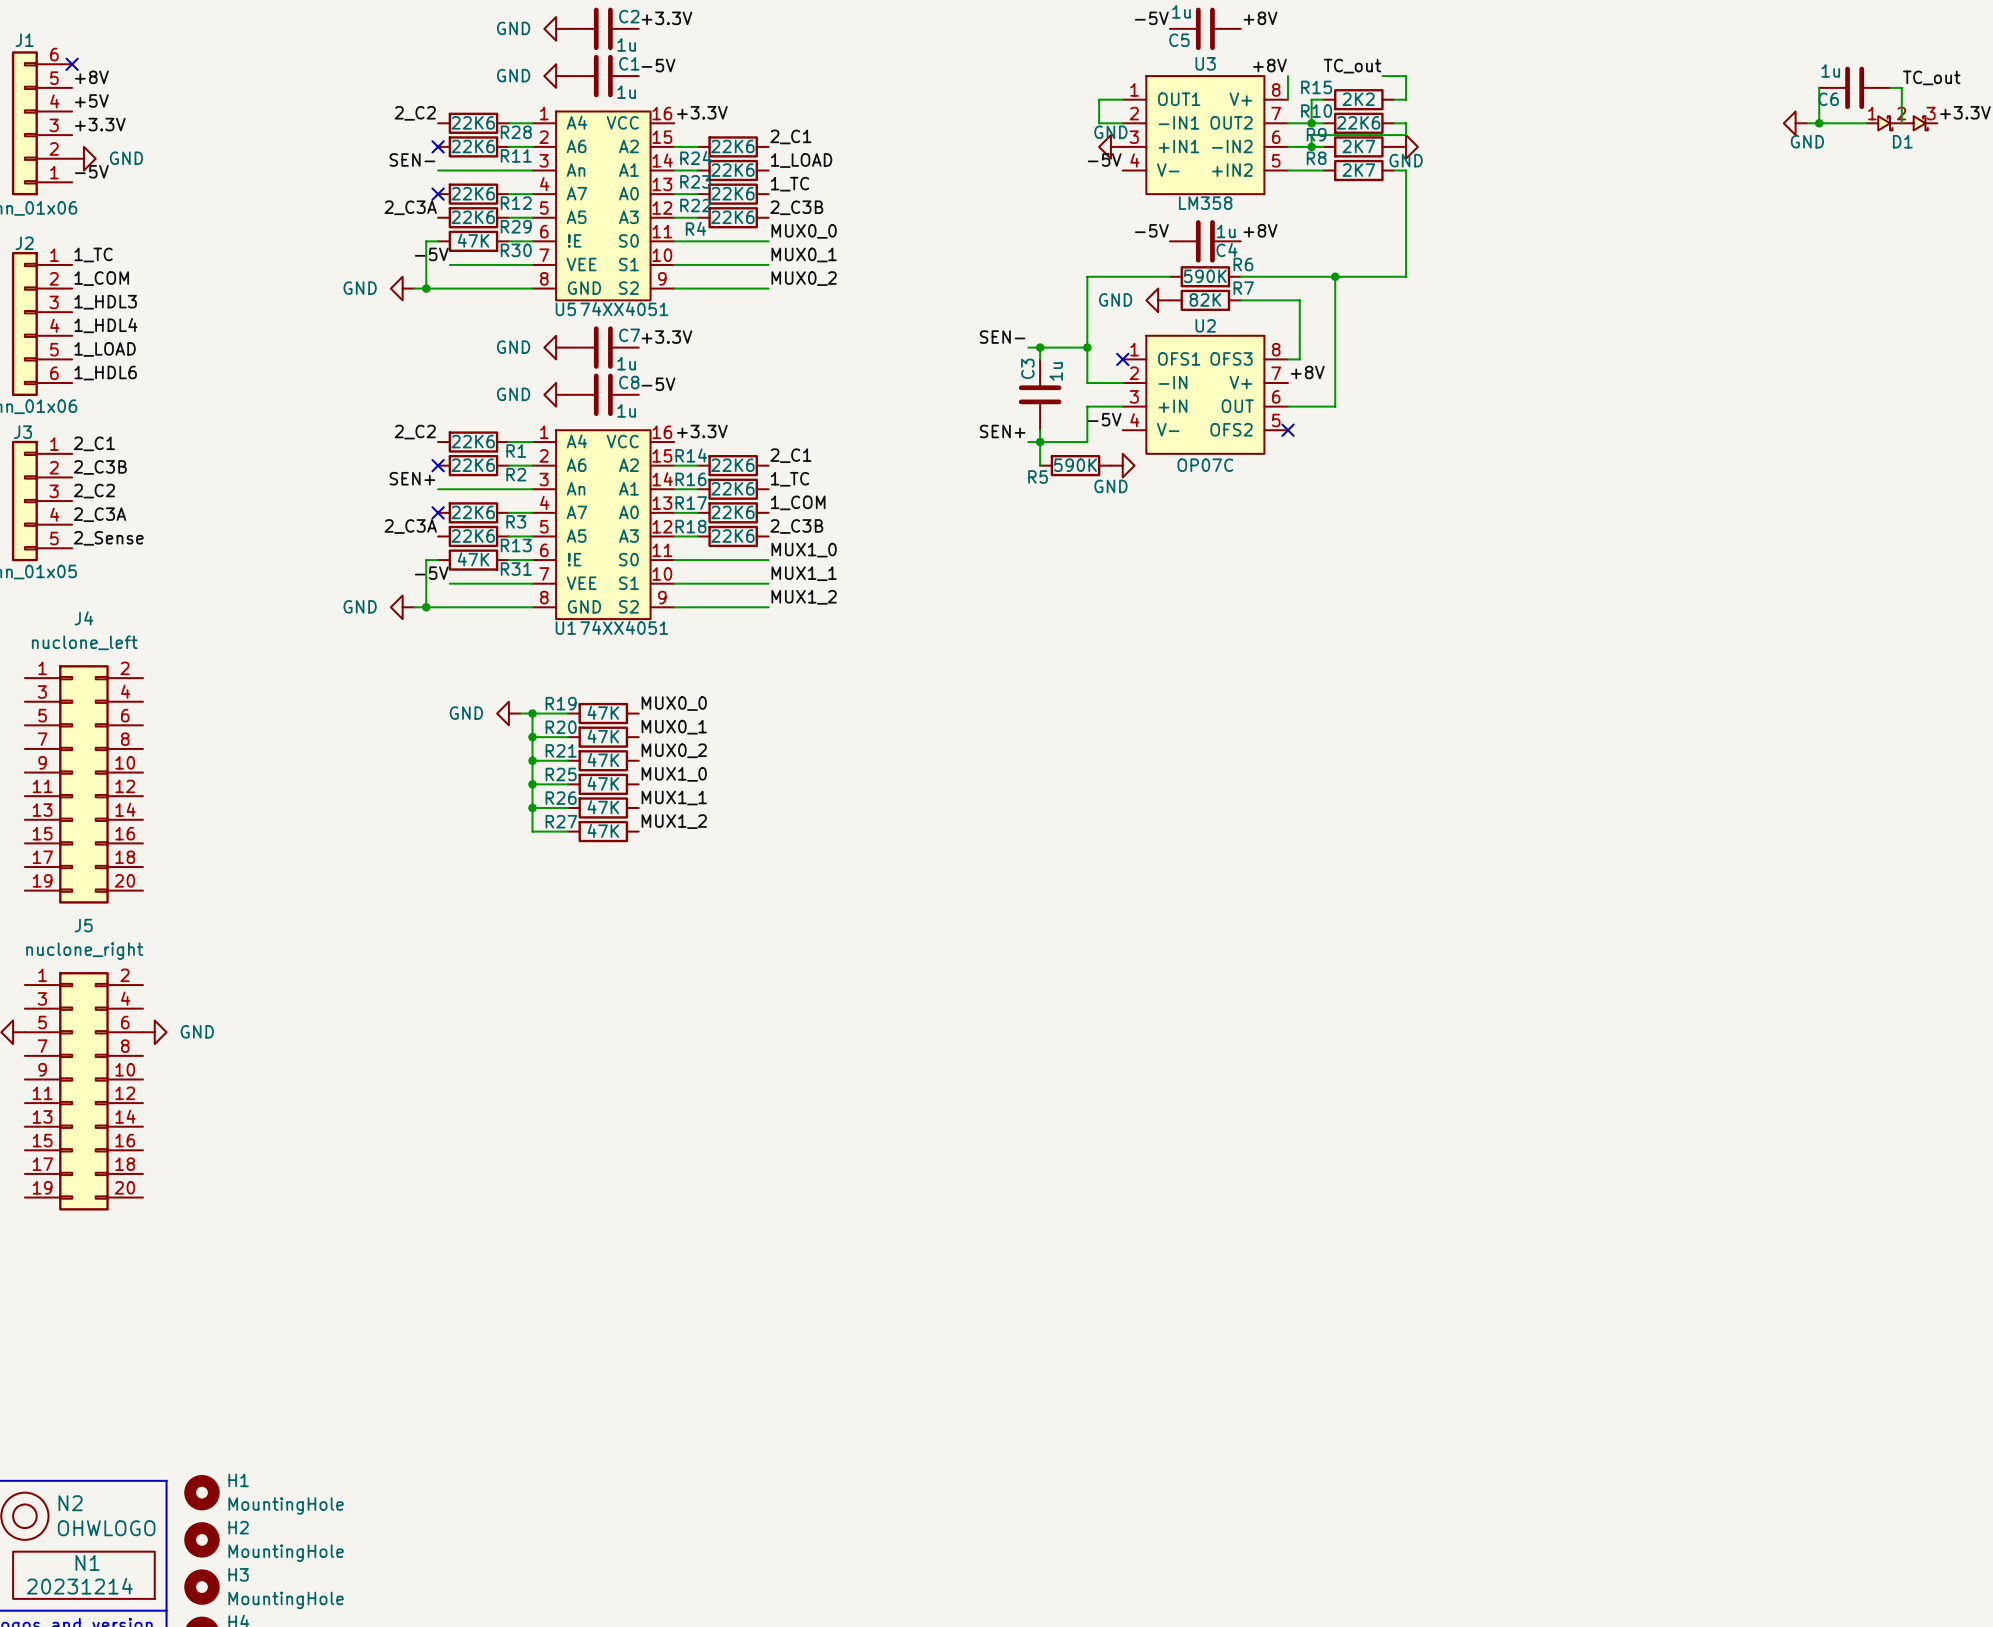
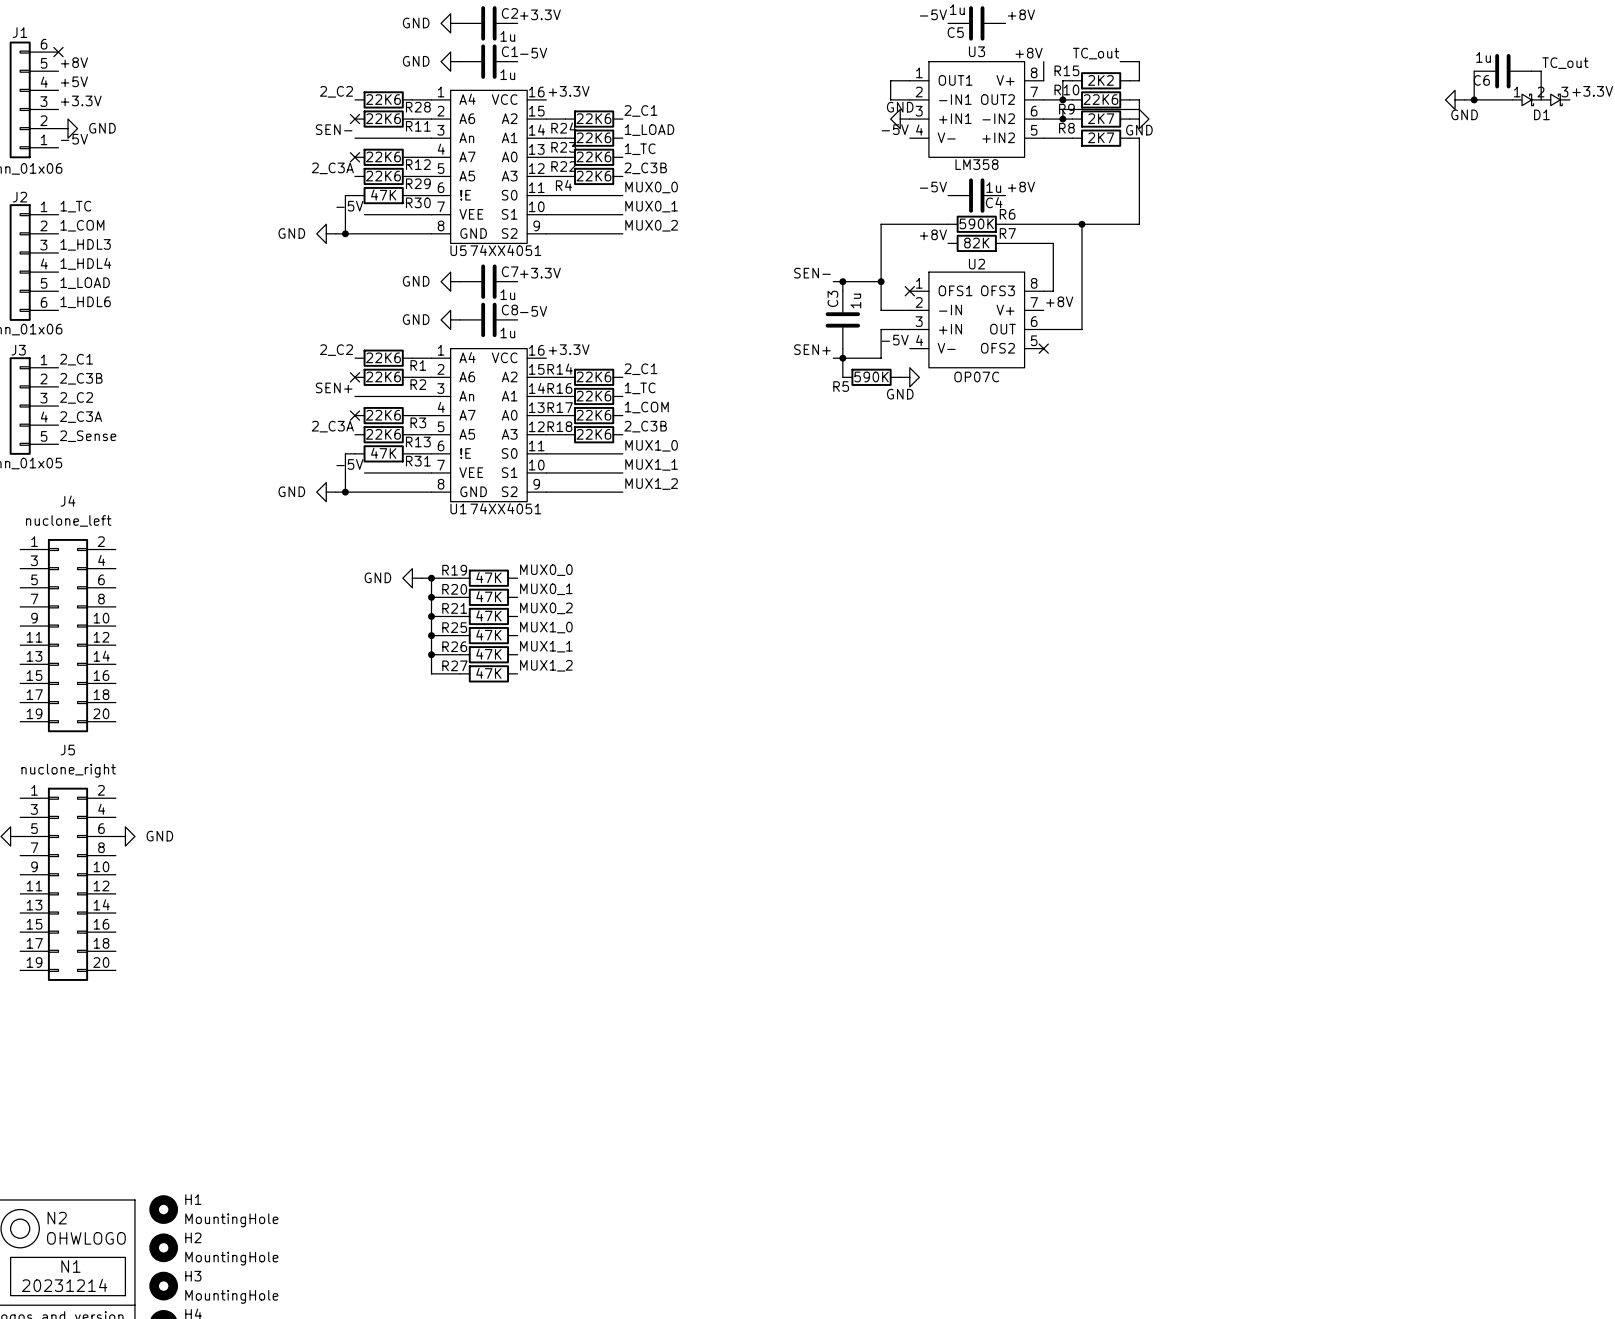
label: none -> +8V (933, 234)
power symbol: GND (1158, 300) -> none

